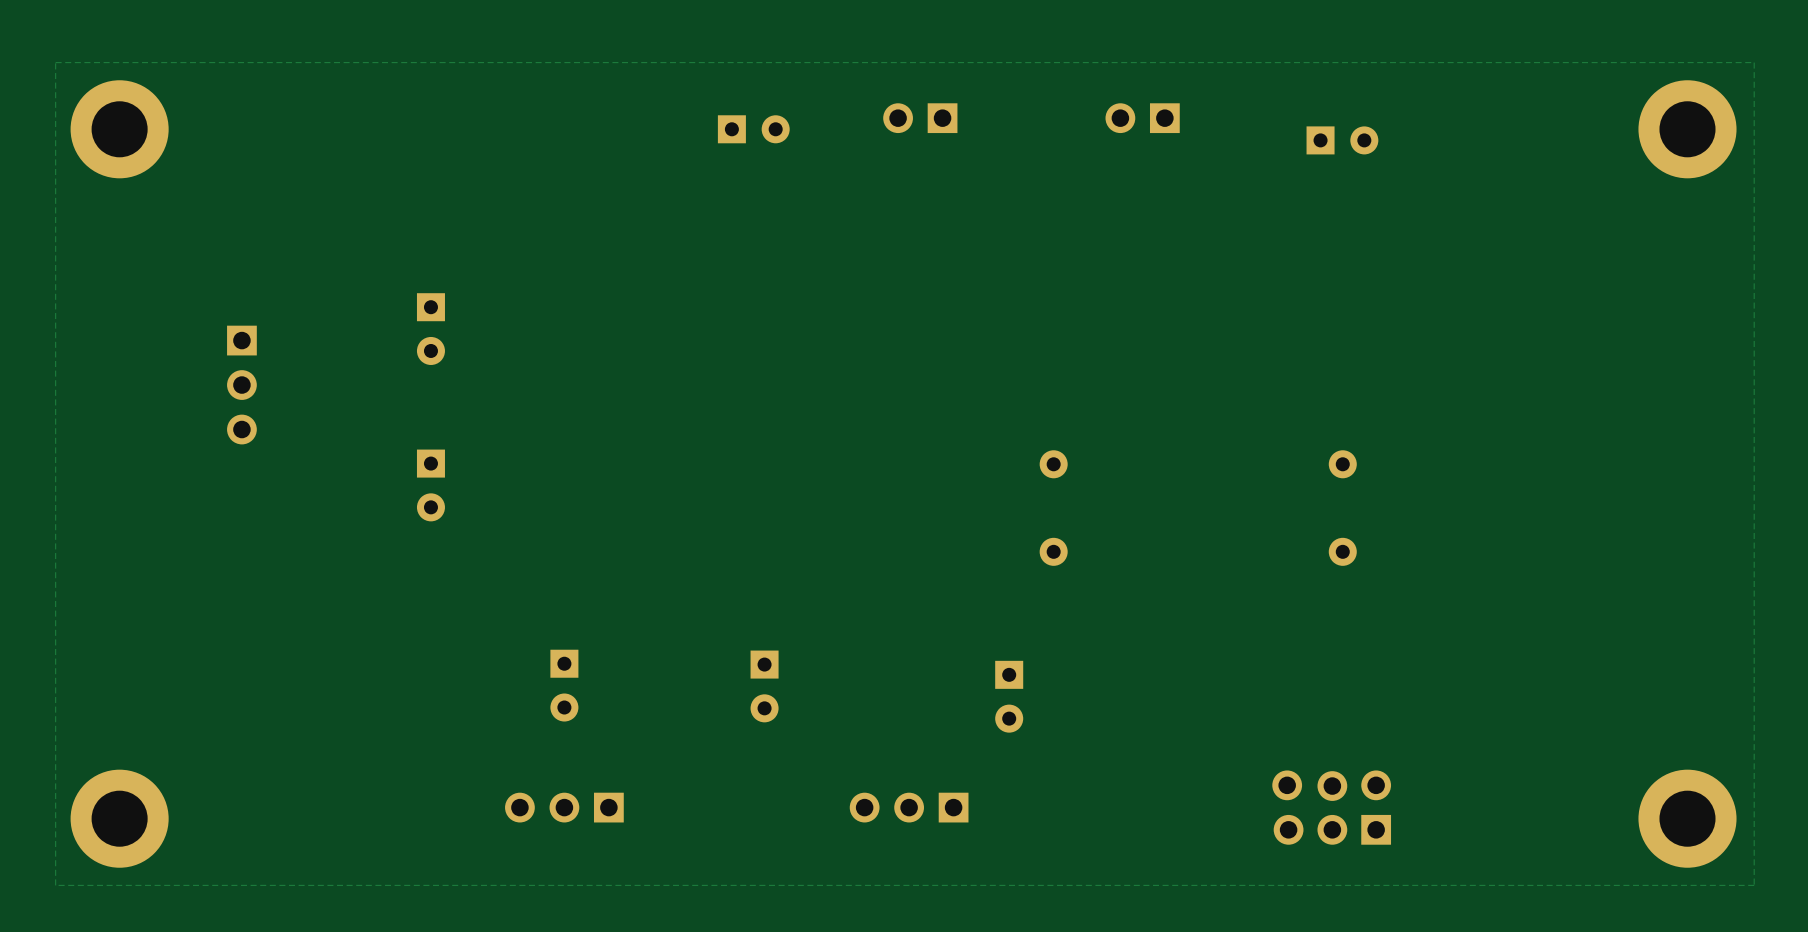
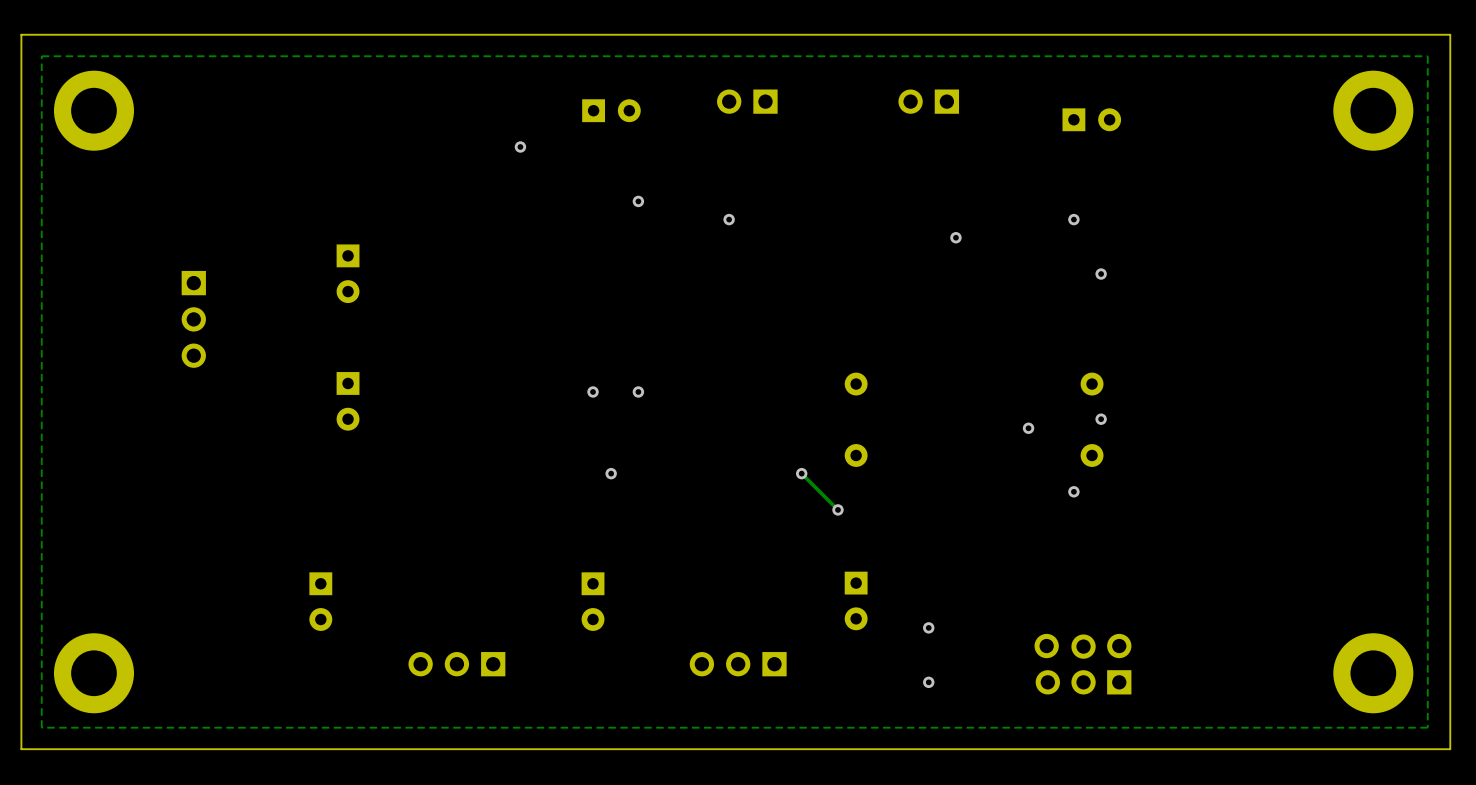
board edge: none -> (1450, 34) (21, 34) (21, 749) (1450, 749) (1450, 34)
via: none -> (520, 146)
via: none -> (638, 201)
via: none -> (729, 219)
via: none -> (1073, 219)
via: none -> (955, 237)
via: none -> (1101, 274)
via: none -> (593, 391)
via: none -> (638, 391)
via: none -> (1101, 419)
via: none -> (1028, 428)
via: none -> (611, 473)
track: none -> (801, 473) (838, 509)
via: none -> (801, 473)
via: none -> (1073, 491)
via: none -> (838, 509)
part: (564, 685) -> none
part position: (764, 686) -> (593, 601)
part position: (1009, 696) -> (856, 600)
part: none -> (320, 601)
via: none -> (928, 627)
via: none -> (928, 682)

